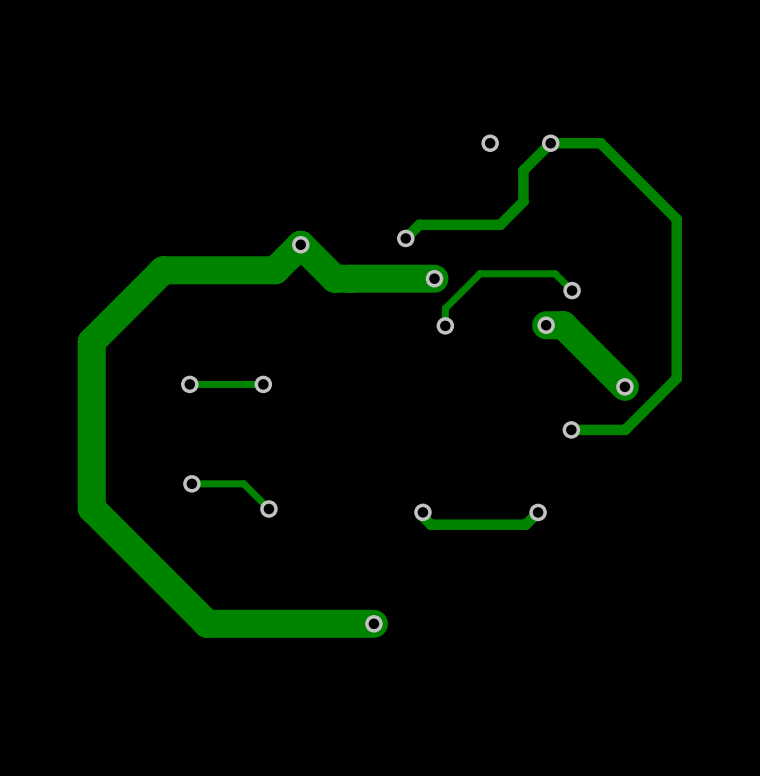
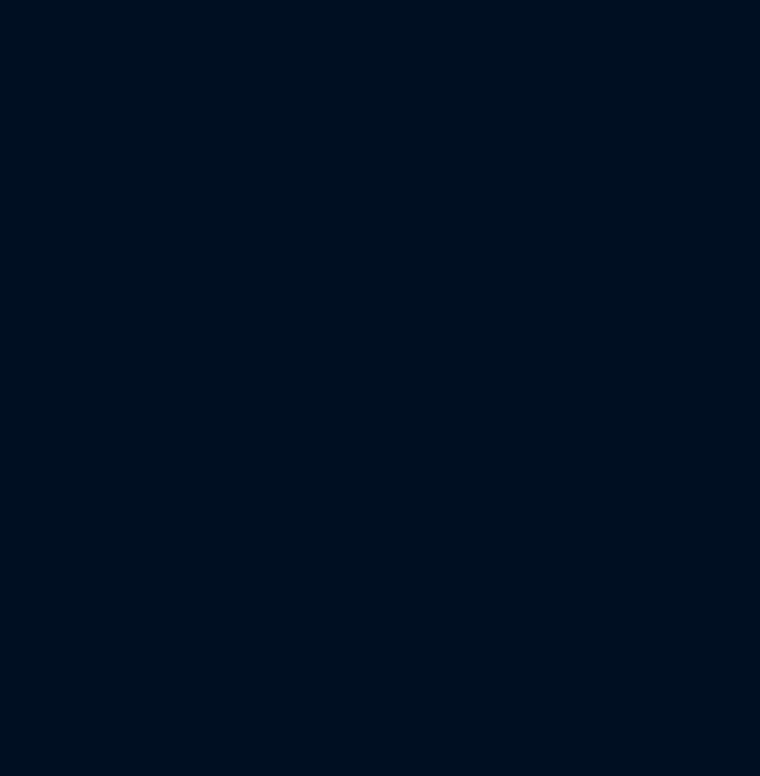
via: (490, 143) -> none
via: (550, 143) -> none
track: (405, 238) (419, 224) (500, 224) (523, 201) (523, 170) (550, 143) (600, 143) (676, 219) (676, 378) (625, 429) (571, 429) -> none
via: (405, 238) -> none
via: (300, 244) -> none
track: (434, 278) (334, 278) (300, 244) (275, 270) (163, 270) (91, 341) (91, 508) (207, 623) (373, 623) -> none
via: (434, 278) -> none
track: (572, 290) (555, 273) (479, 273) (445, 308) (445, 325) -> none
via: (572, 290) -> none
via: (445, 325) -> none
track: (546, 325) (563, 325) (624, 386) -> none
via: (546, 325) -> none
via: (189, 384) -> none
track: (263, 384) (189, 384) -> none
via: (263, 384) -> none
via: (624, 386) -> none
via: (571, 429) -> none
track: (191, 483) (243, 483) (268, 508) -> none
via: (191, 483) -> none
via: (268, 508) -> none
via: (422, 512) -> none
track: (538, 512) (525, 524) (430, 524) (422, 516) (422, 512) -> none
via: (538, 512) -> none
via: (373, 623) -> none

